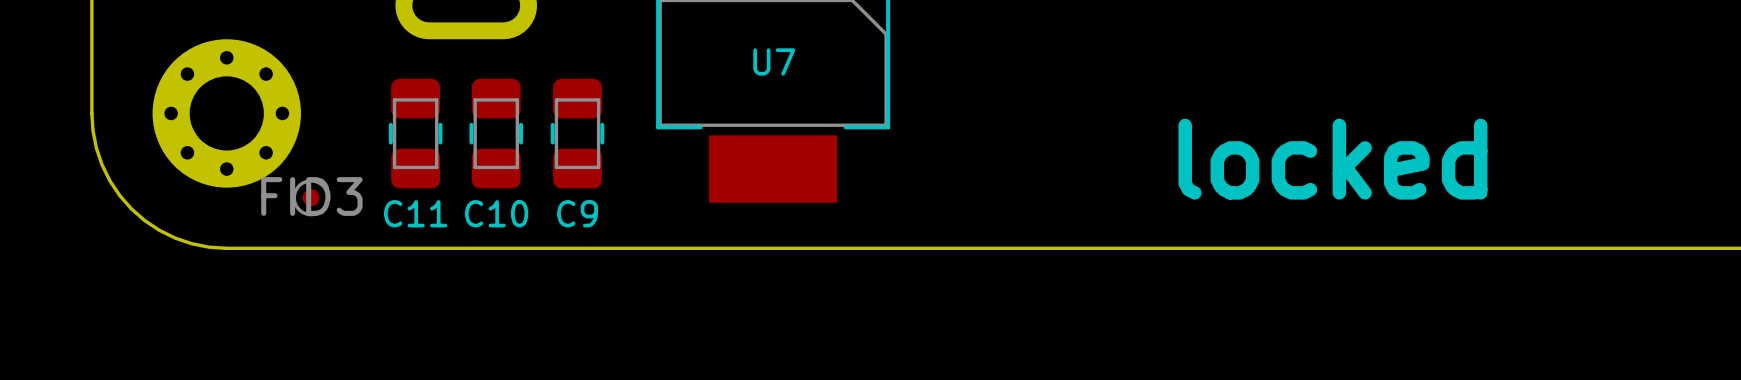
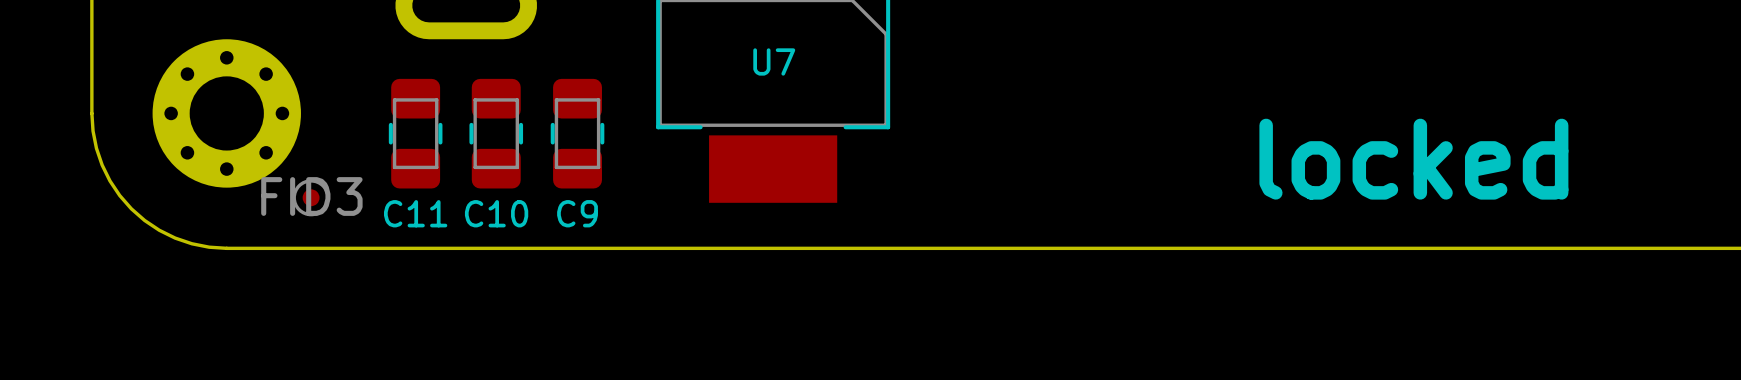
text position: locked (1332, 159) -> locked (1413, 159)

